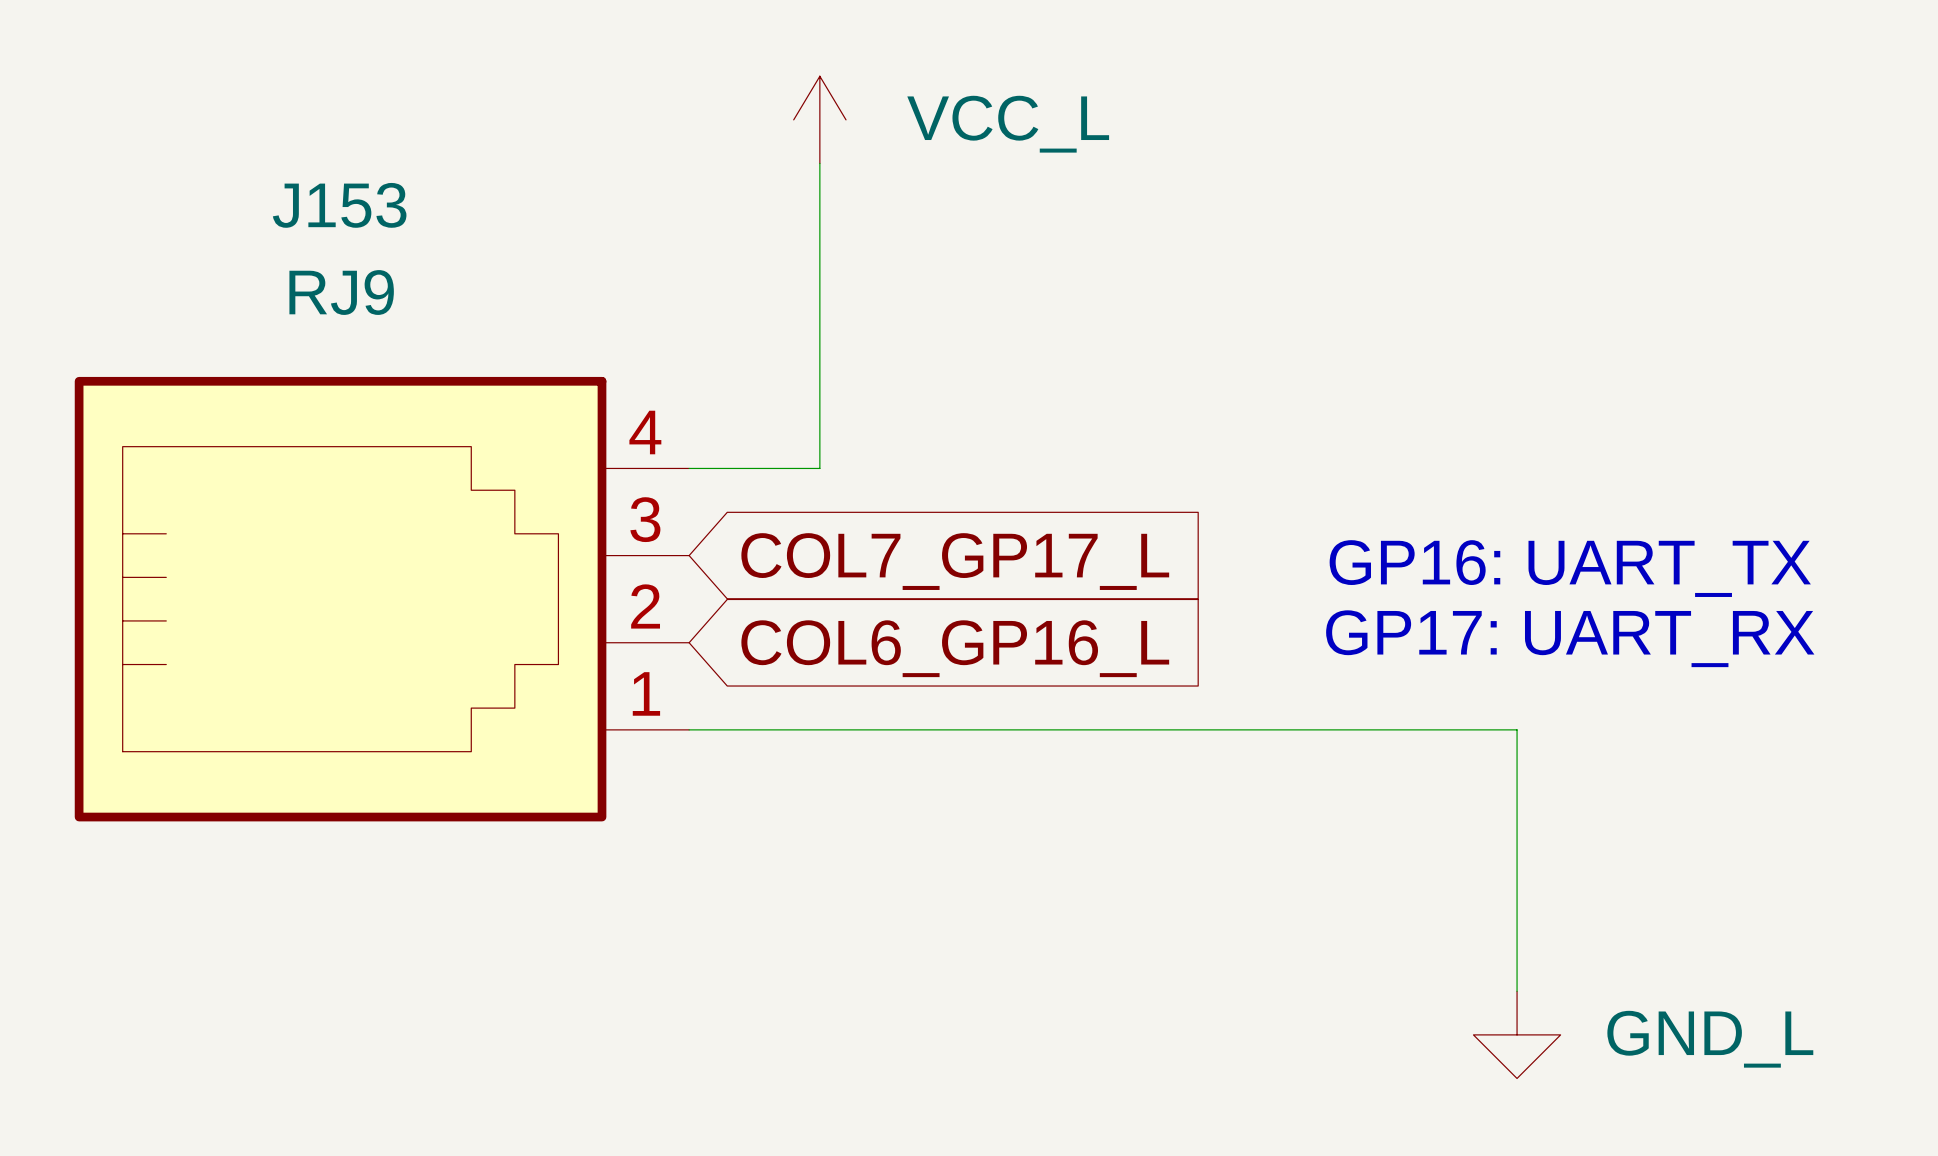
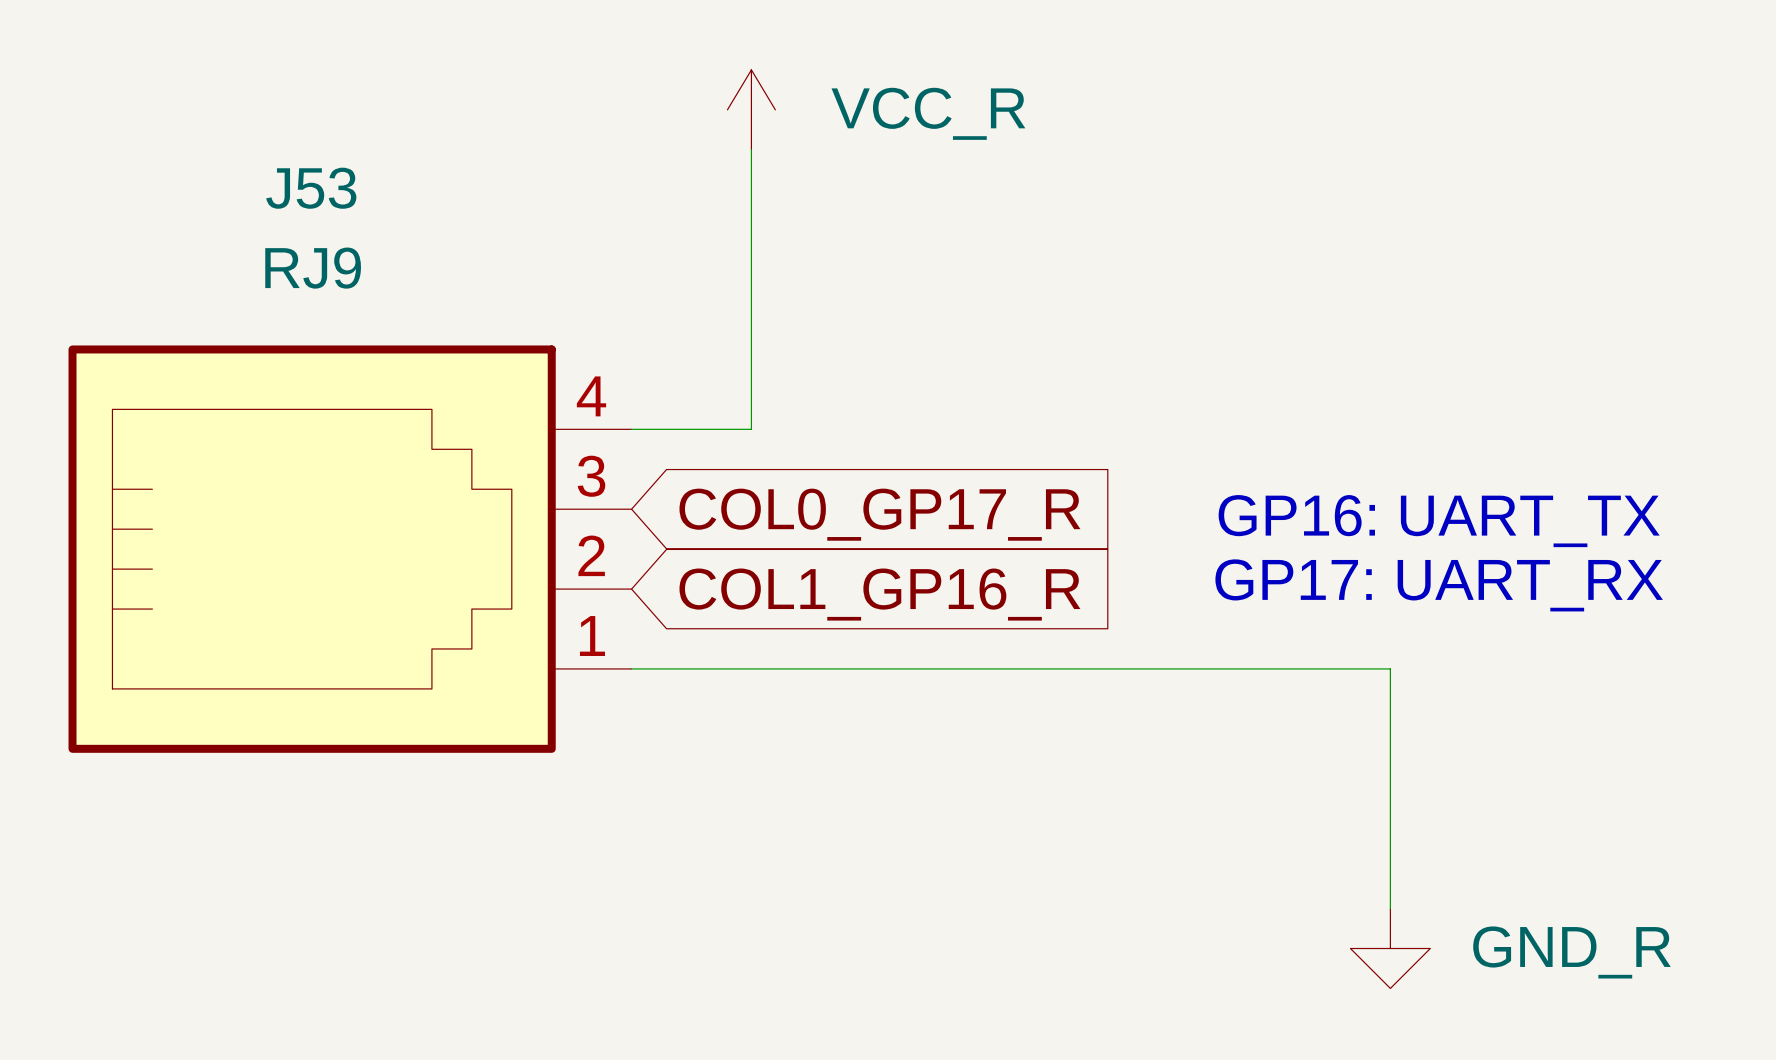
power symbol: VCC_L (819, 119) -> VCC_R (751, 109)
J153 name: J153 (339, 205) -> J53 (311, 188)
global label: COL7_GP17_L (955, 561) -> COL0_GP17_R (879, 514)
global label: COL6_GP16_L (955, 648) -> COL1_GP16_R (879, 594)
power symbol: GND_L (1517, 1034) -> GND_R (1390, 948)

